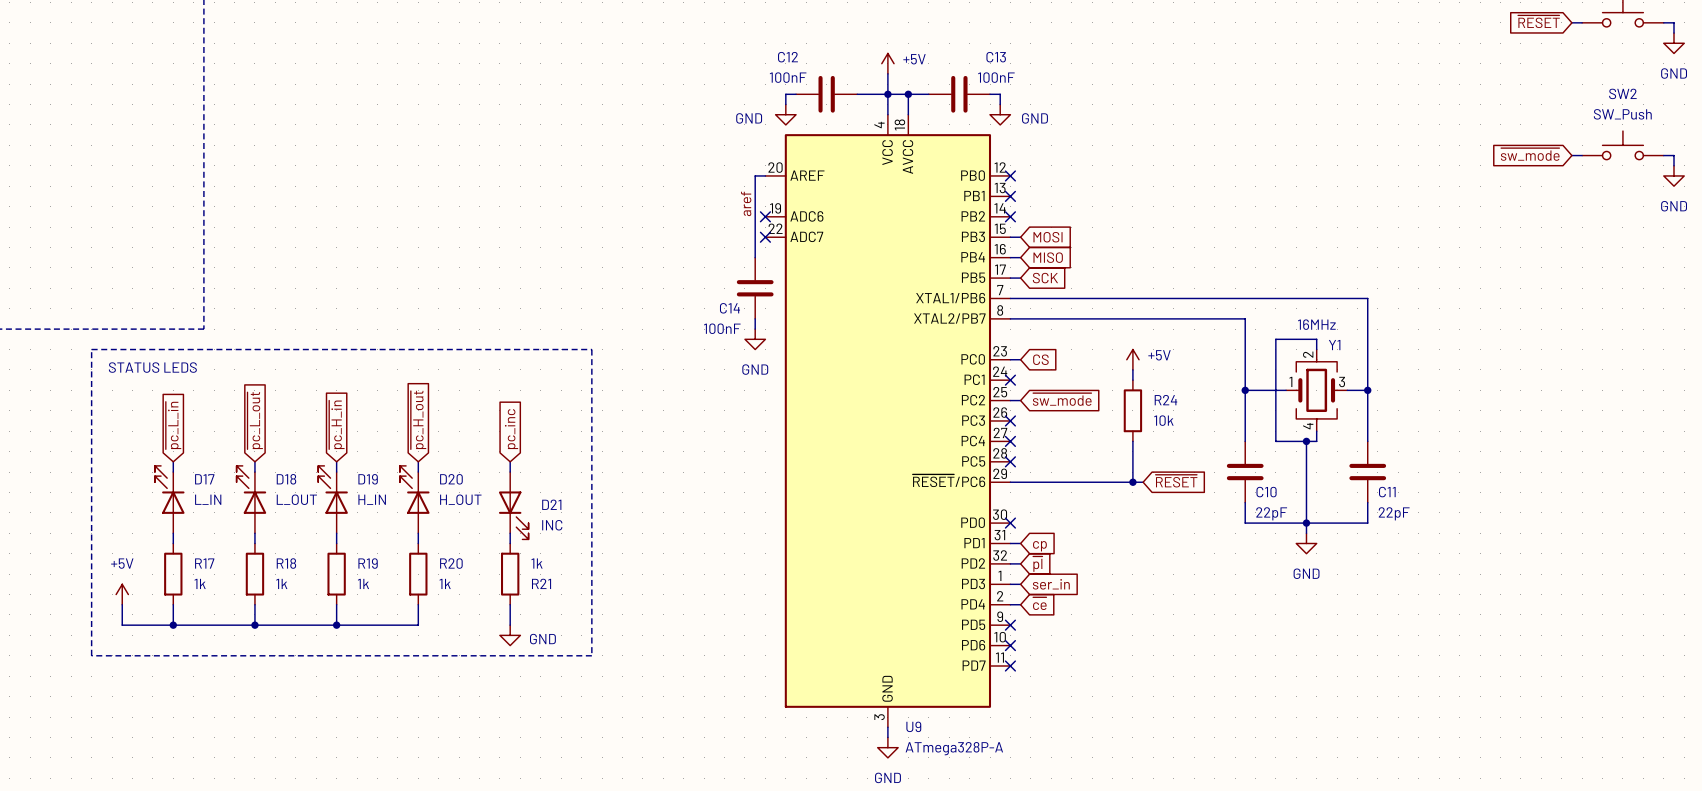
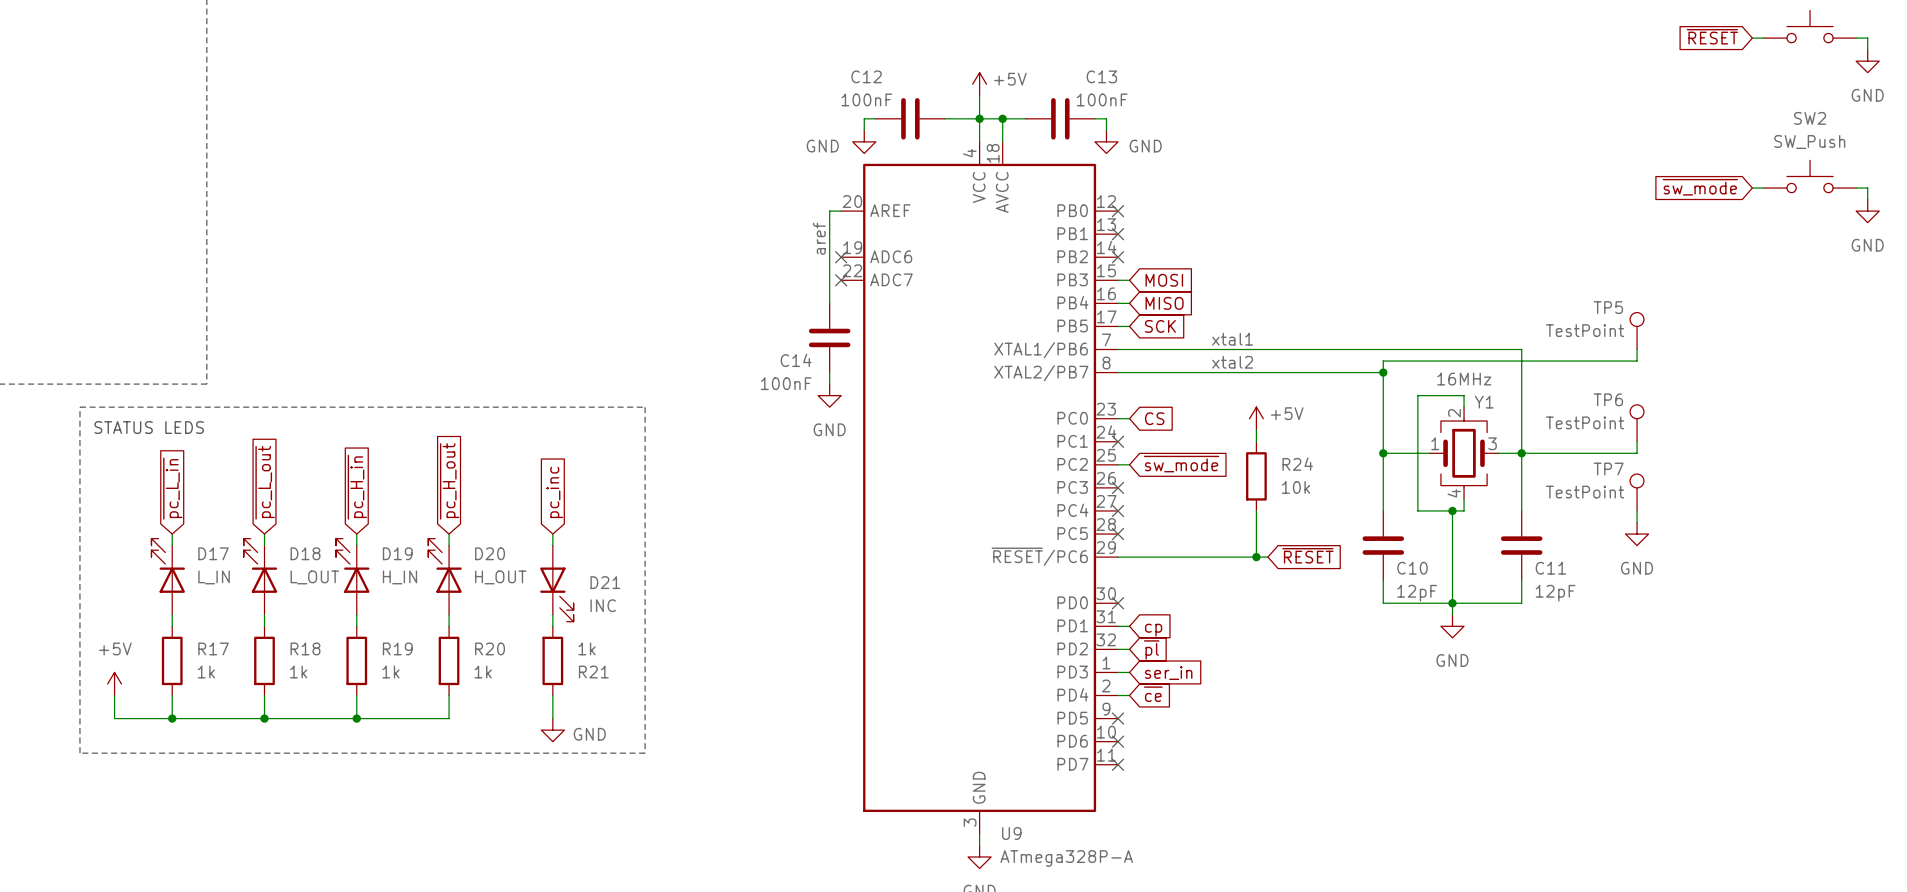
TP5: none -> TestPoint (1637, 331)
label: none -> xtal1 (1232, 339)
wire: none -> (1637, 349) (1637, 361) (1383, 361) (1383, 372)
label: none -> xtal2 (1232, 362)
junction: none -> (1383, 372)
TP6: none -> TestPoint (1637, 423)
wire: none -> (1637, 441) (1637, 453) (1521, 453)
TP7: none -> TestPoint (1637, 492)
wire: none -> (1637, 510) (1637, 522)
power symbol: none -> GND (1637, 534)
C10 value: 22pF (1271, 513) -> 12pF (1417, 593)
C11 value: 22pF (1394, 513) -> 12pF (1555, 593)

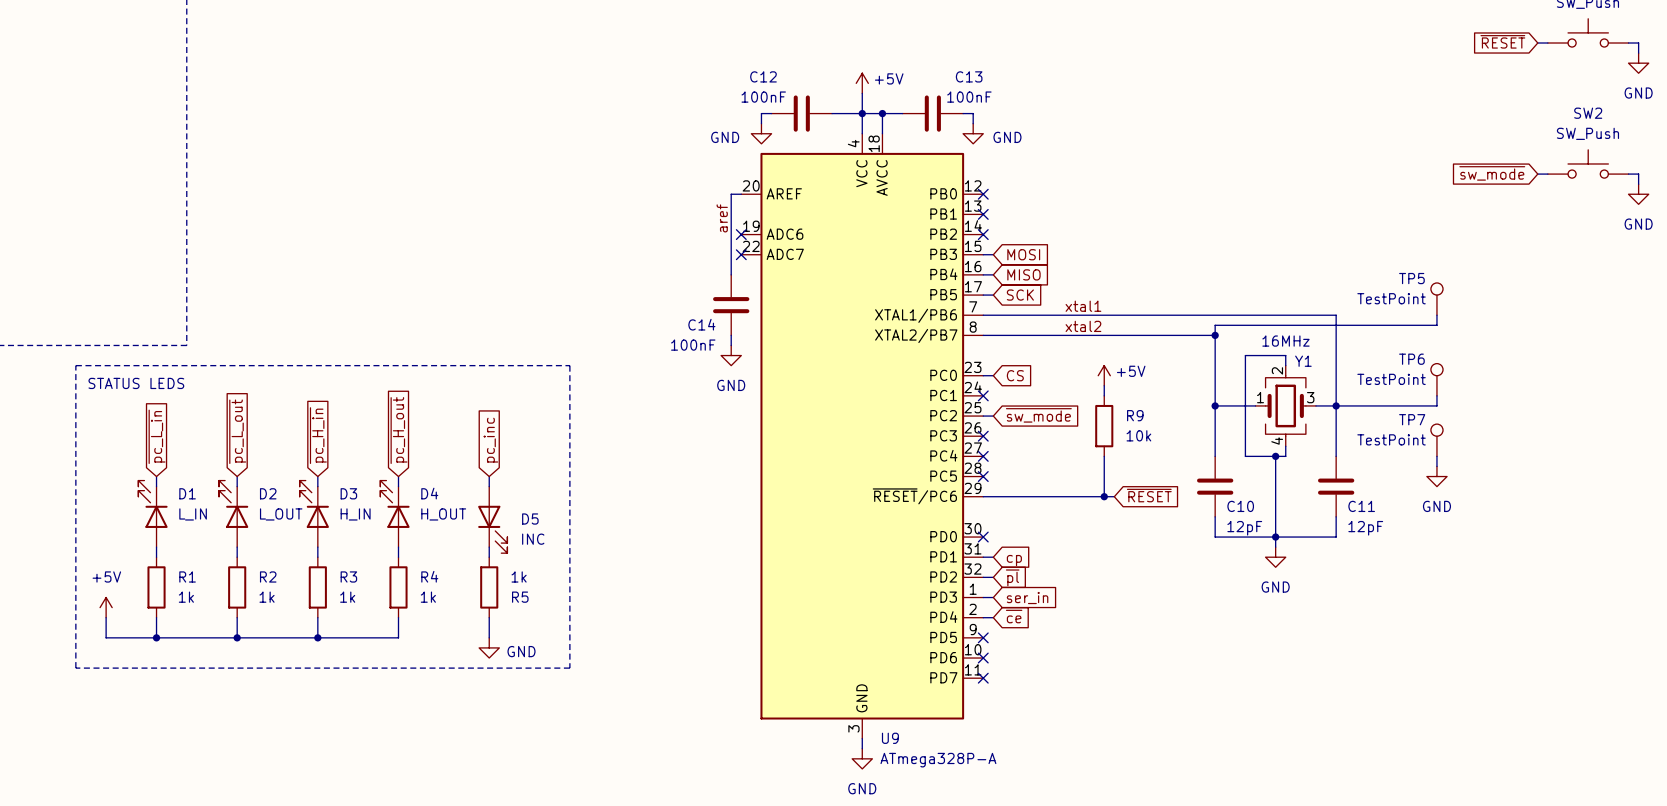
R24 name: R24 (1297, 464) -> R9 (1135, 415)
D17 name: D17 (213, 553) -> D1 (187, 493)
D18 name: D18 (305, 553) -> D2 (268, 493)
D19 name: D19 (397, 553) -> D3 (348, 493)
D20 name: D20 (490, 553) -> D4 (429, 493)
D21 name: D21 (605, 582) -> D5 (530, 519)
R17 name: R17 (213, 648) -> R1 (187, 576)
R18 name: R18 (305, 648) -> R2 (268, 576)
R19 name: R19 (397, 648) -> R3 (348, 576)
R20 name: R20 (490, 648) -> R4 (429, 576)
R21 name: R21 (593, 672) -> R5 (520, 597)

